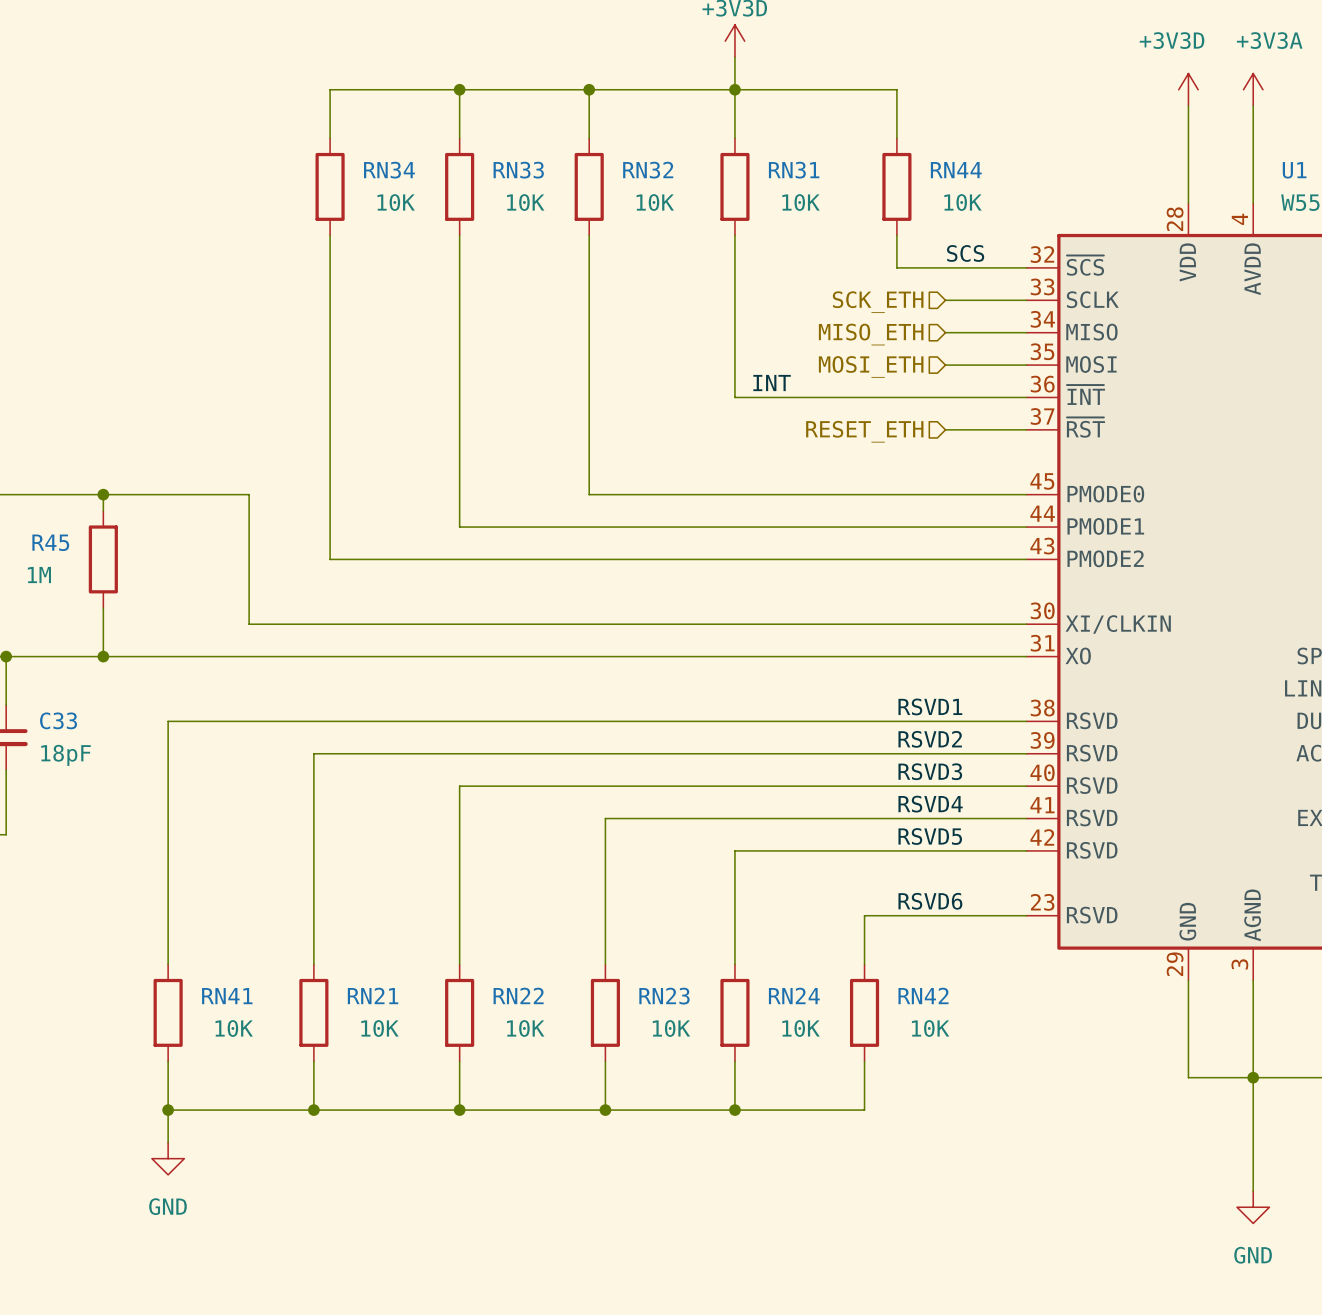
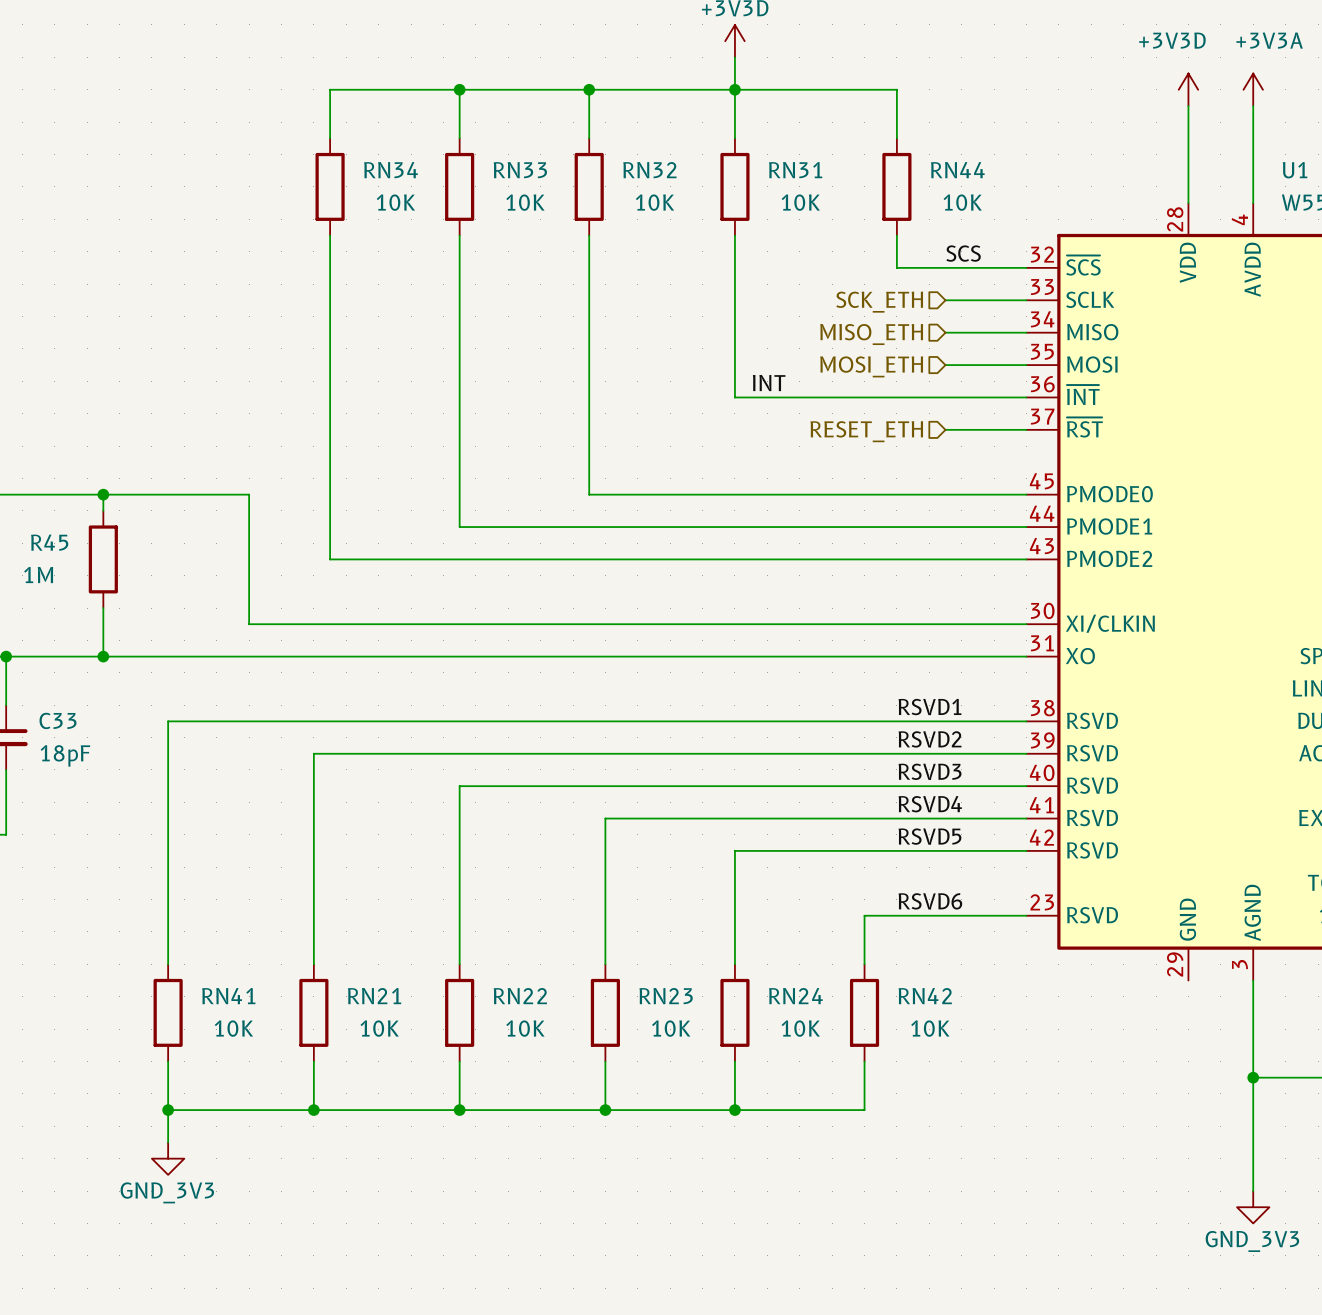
wire: (1188, 980) (1188, 1077) (1253, 1077) -> none
power symbol: GND (168, 1158) -> GND_3V3 (168, 1158)
power symbol: GND (1253, 1207) -> GND_3V3 (1253, 1207)

